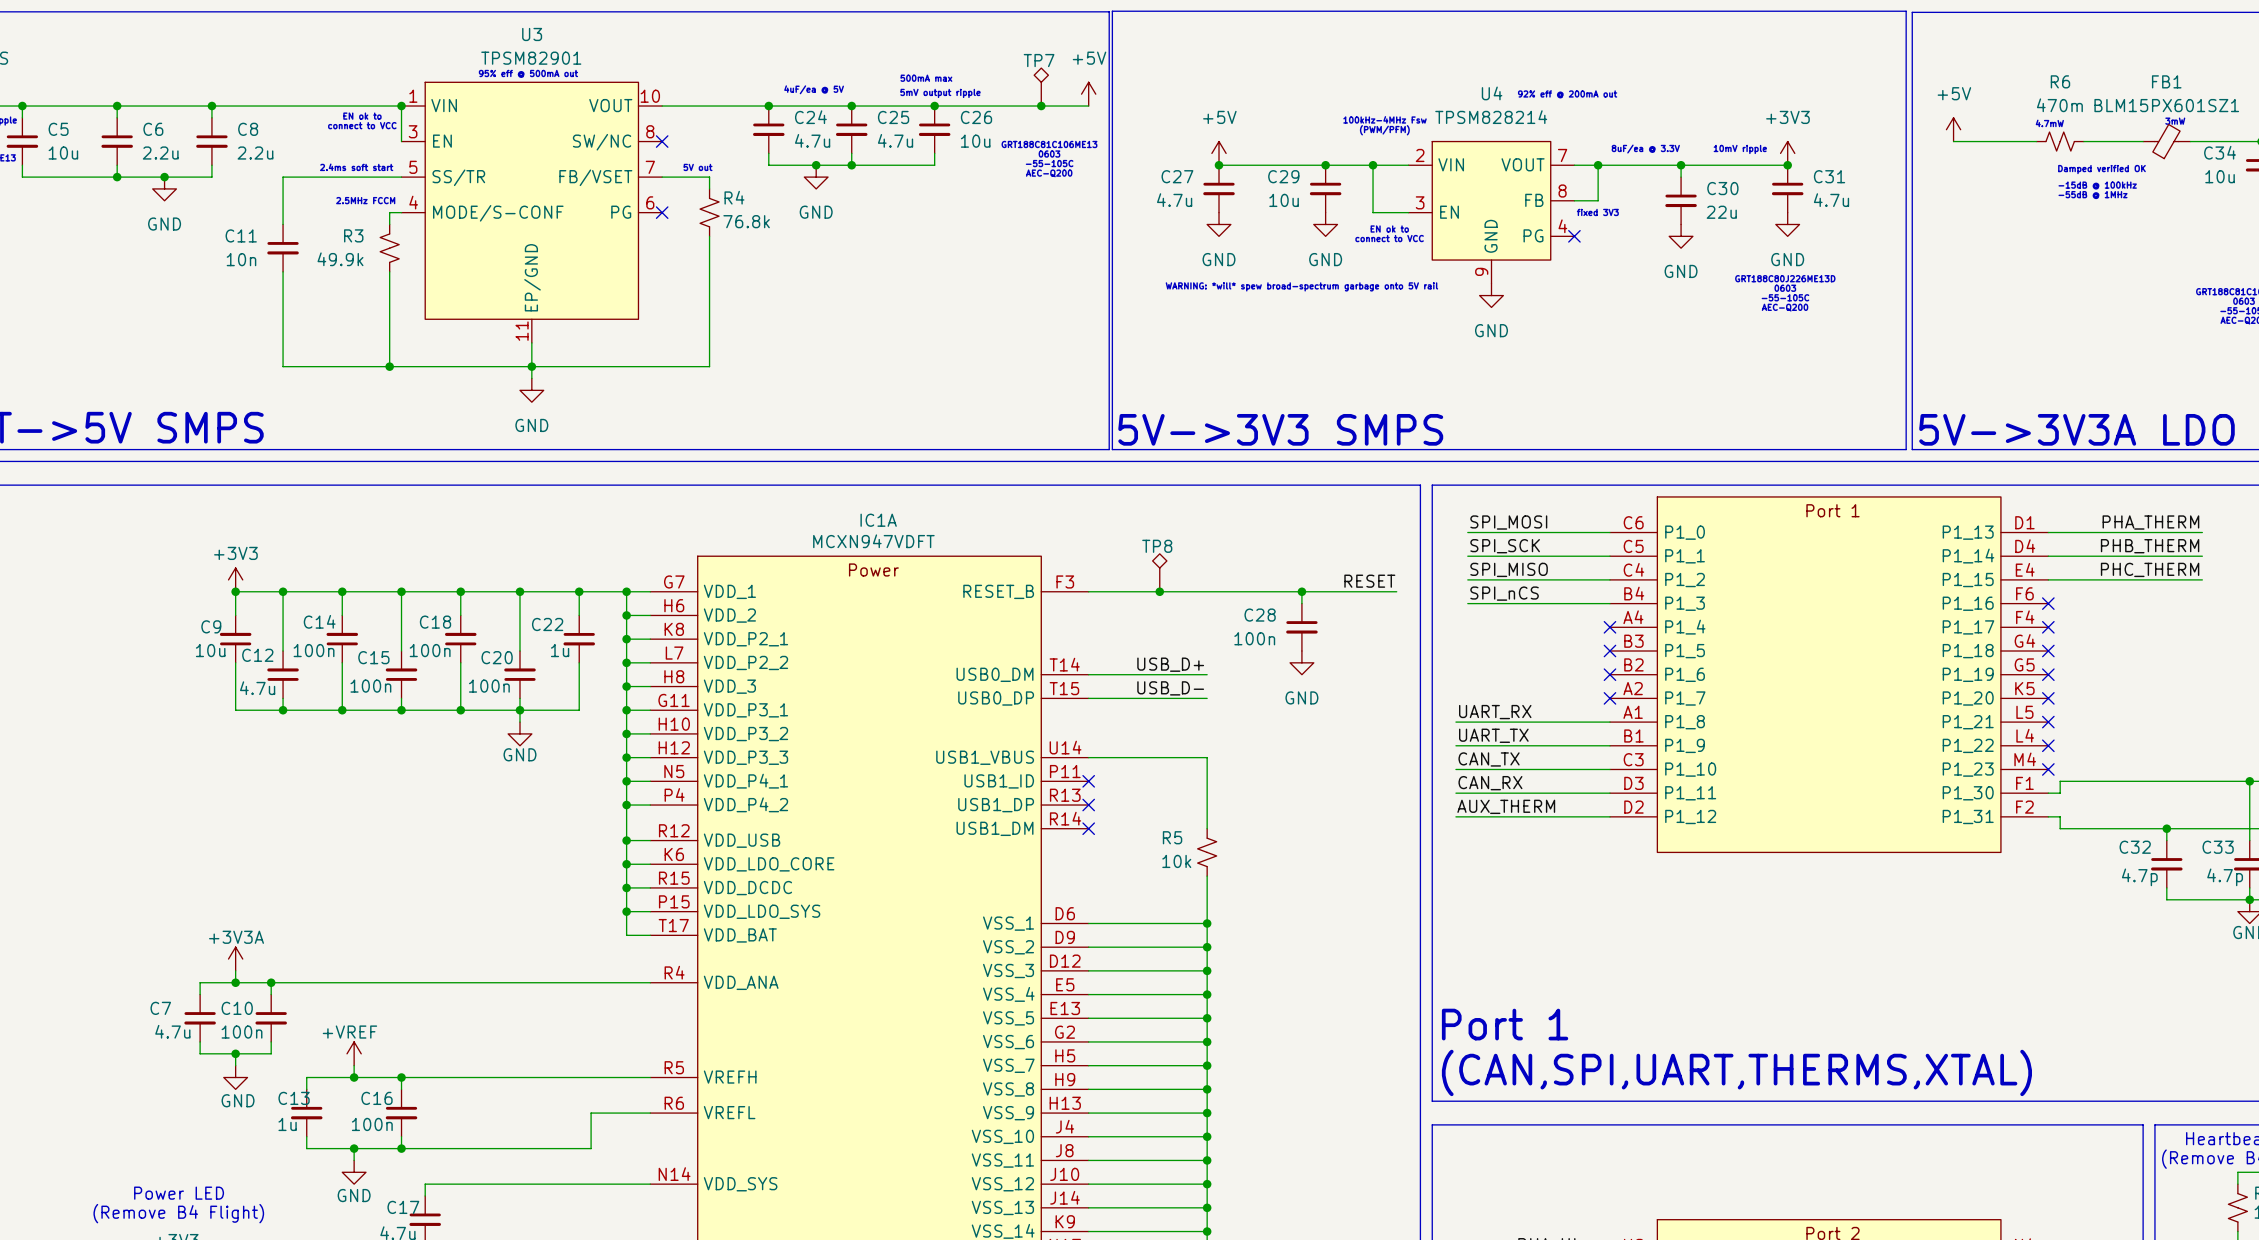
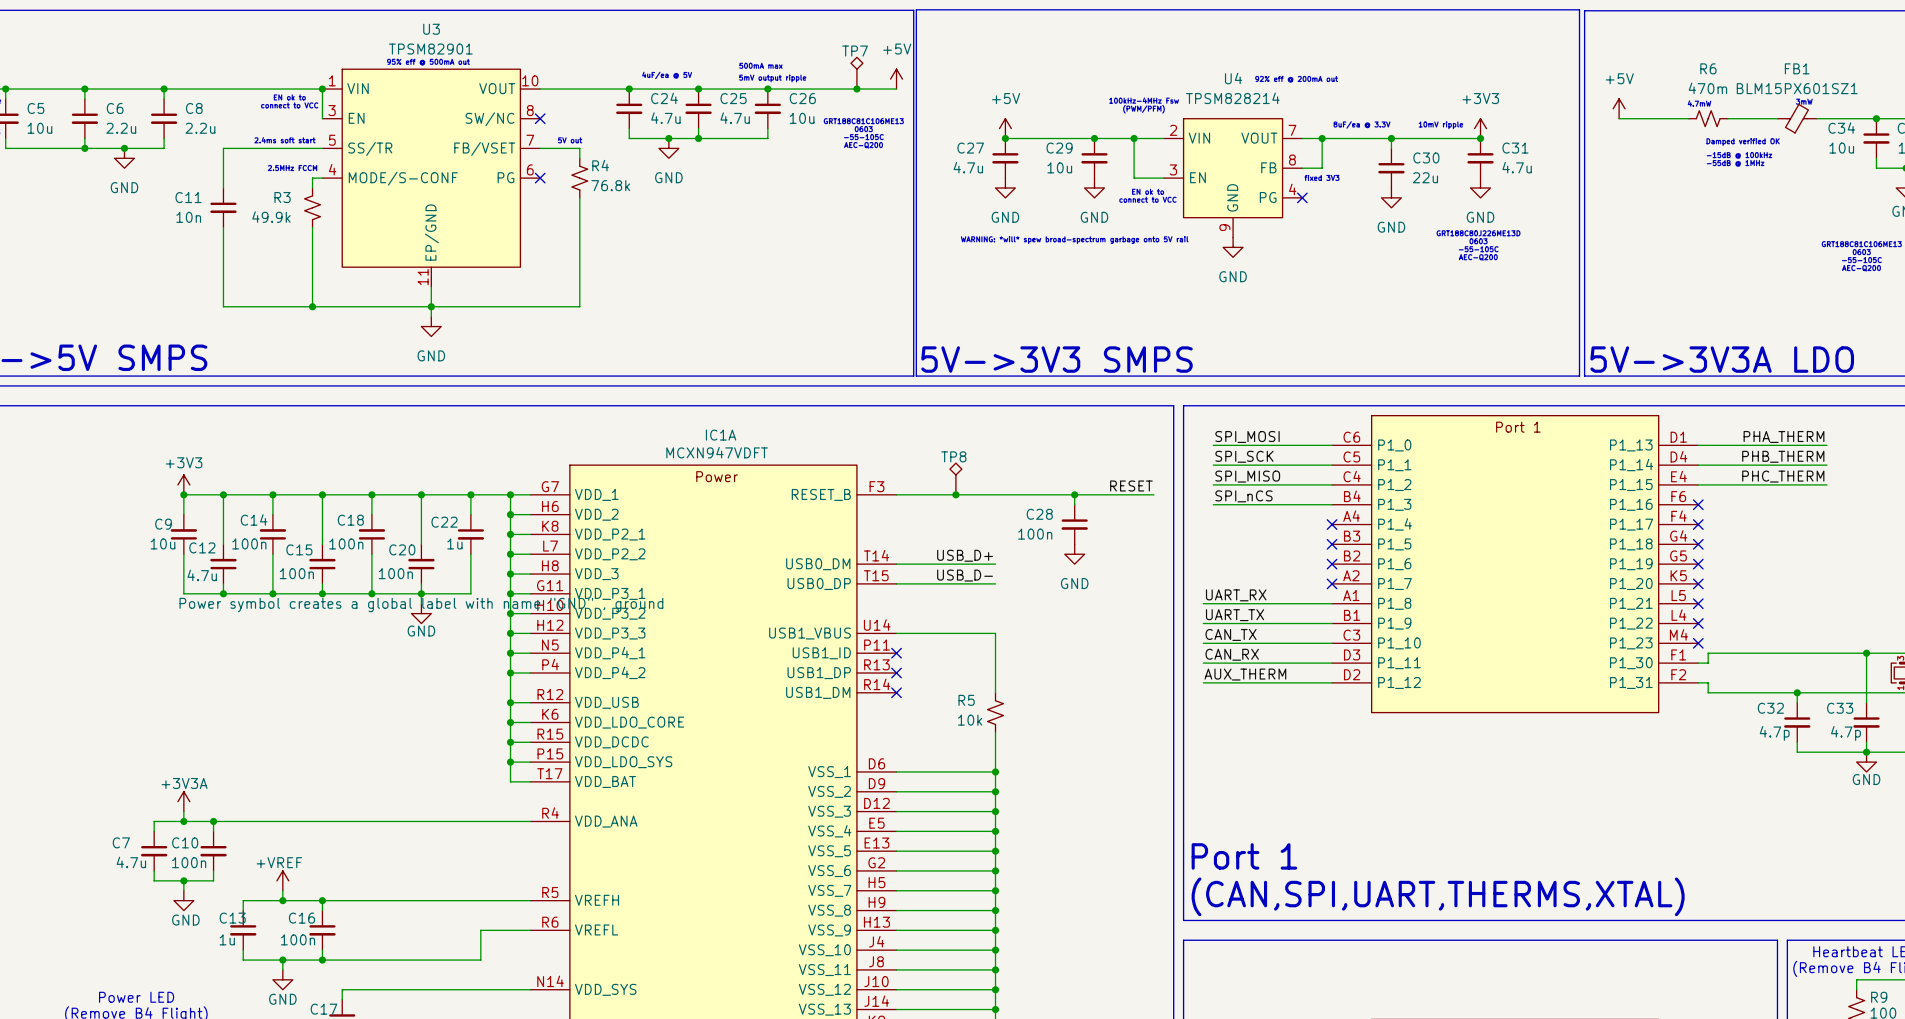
power symbol text: none -> Power symbol creates a global label with name "GND" , ground (421, 604)

